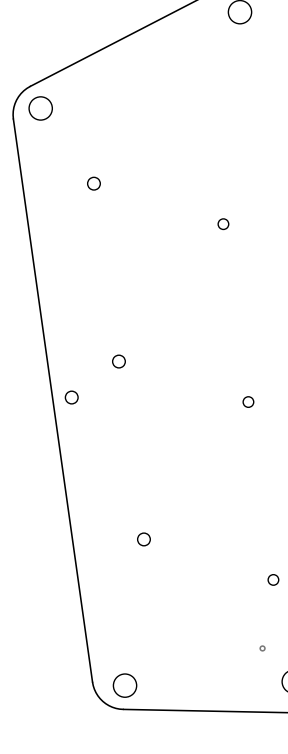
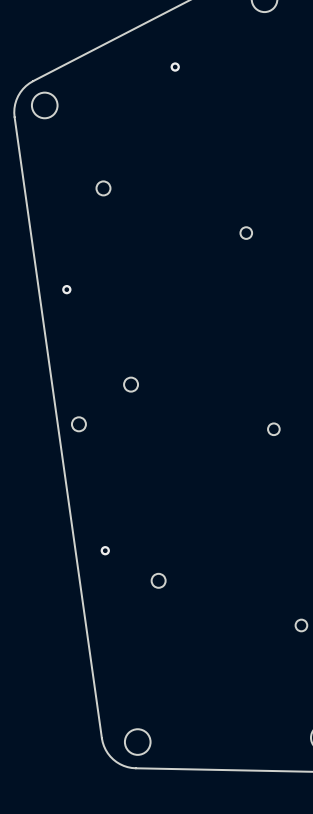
via: none -> (175, 67)
via: none -> (66, 289)
via: none -> (105, 550)
via: (262, 648) -> none

